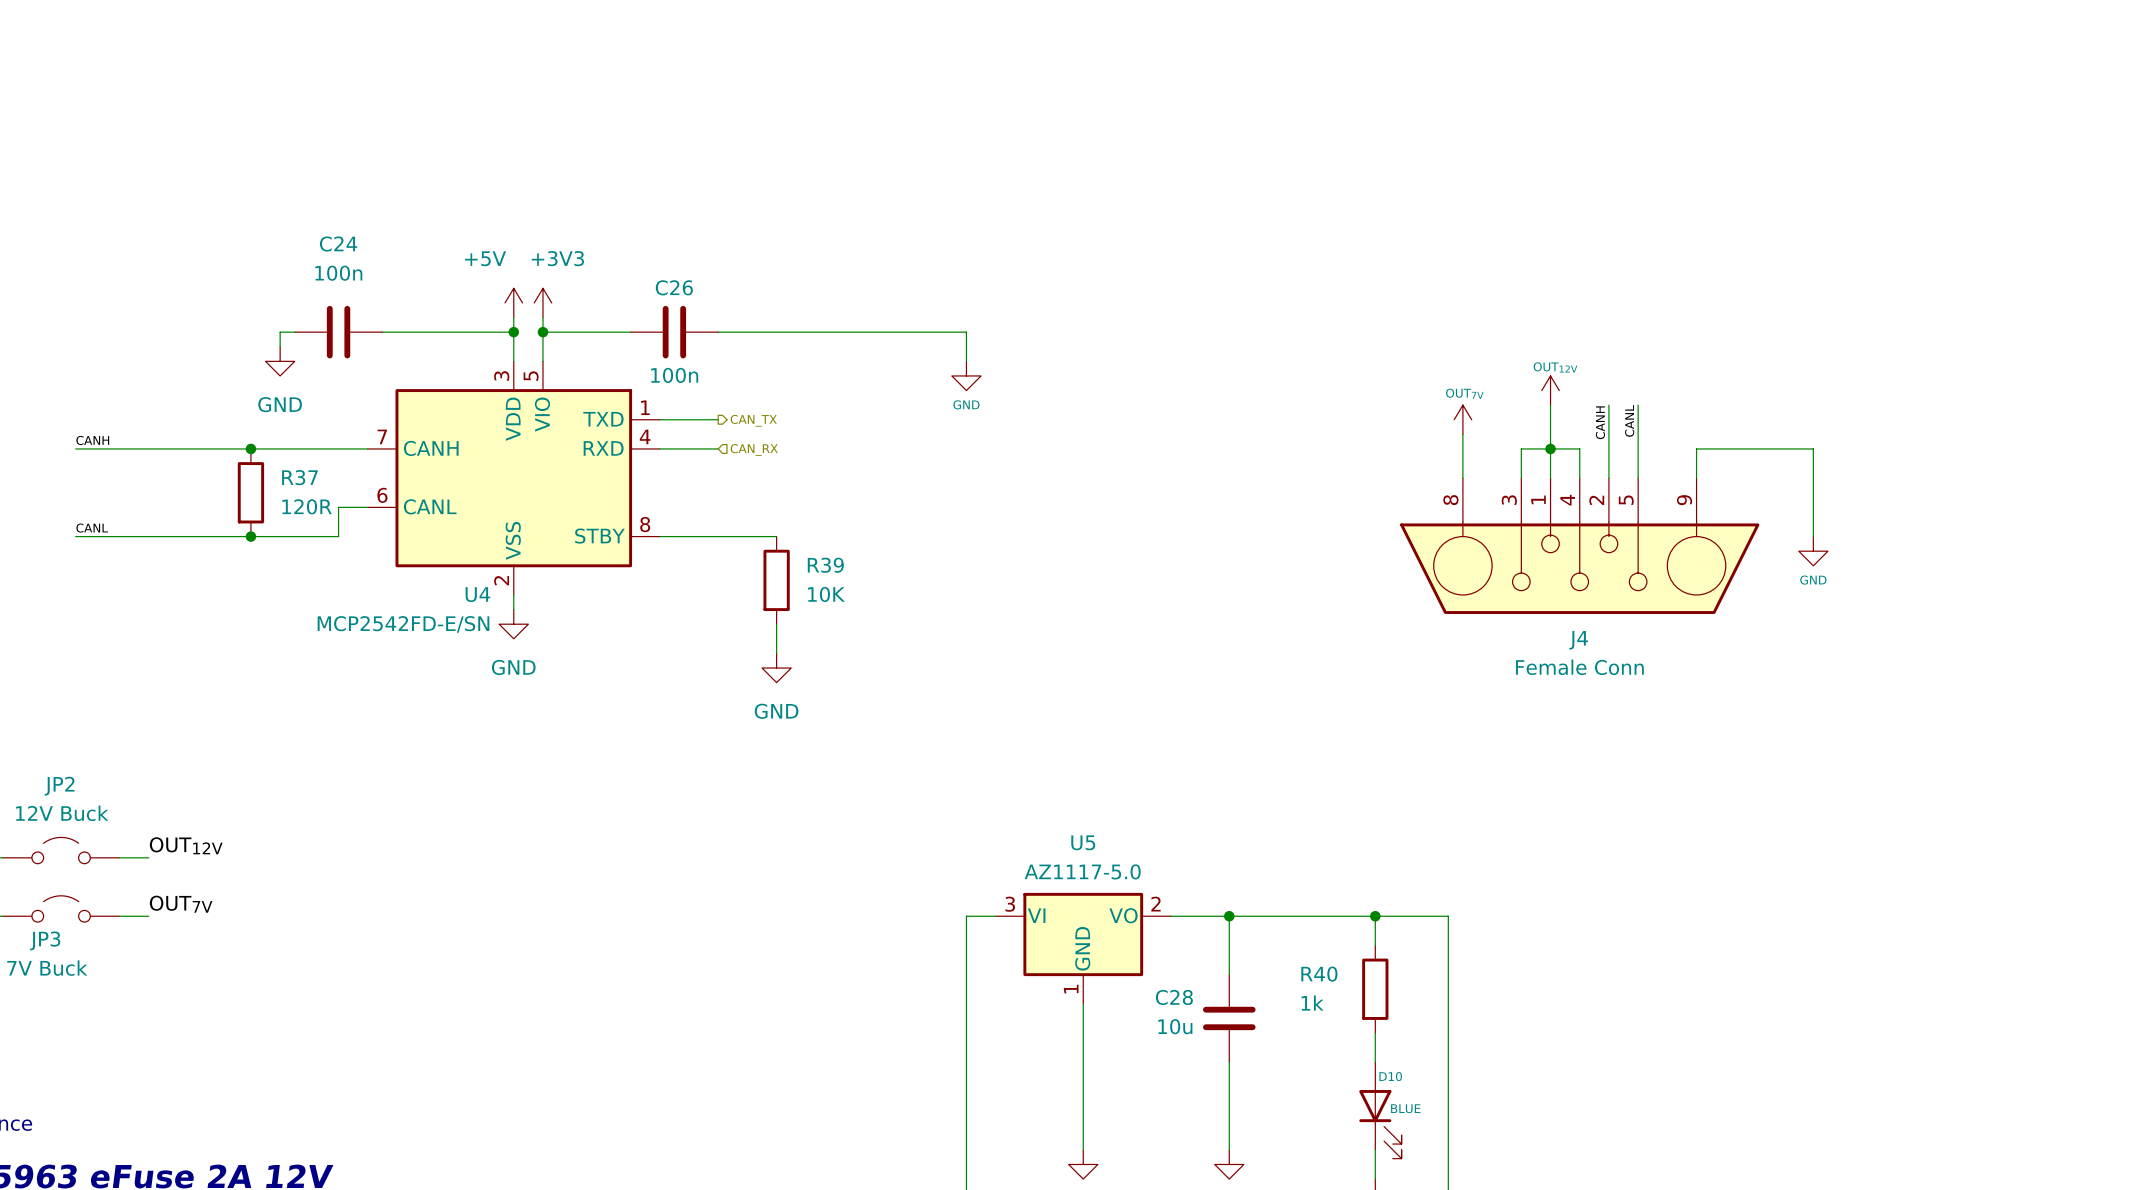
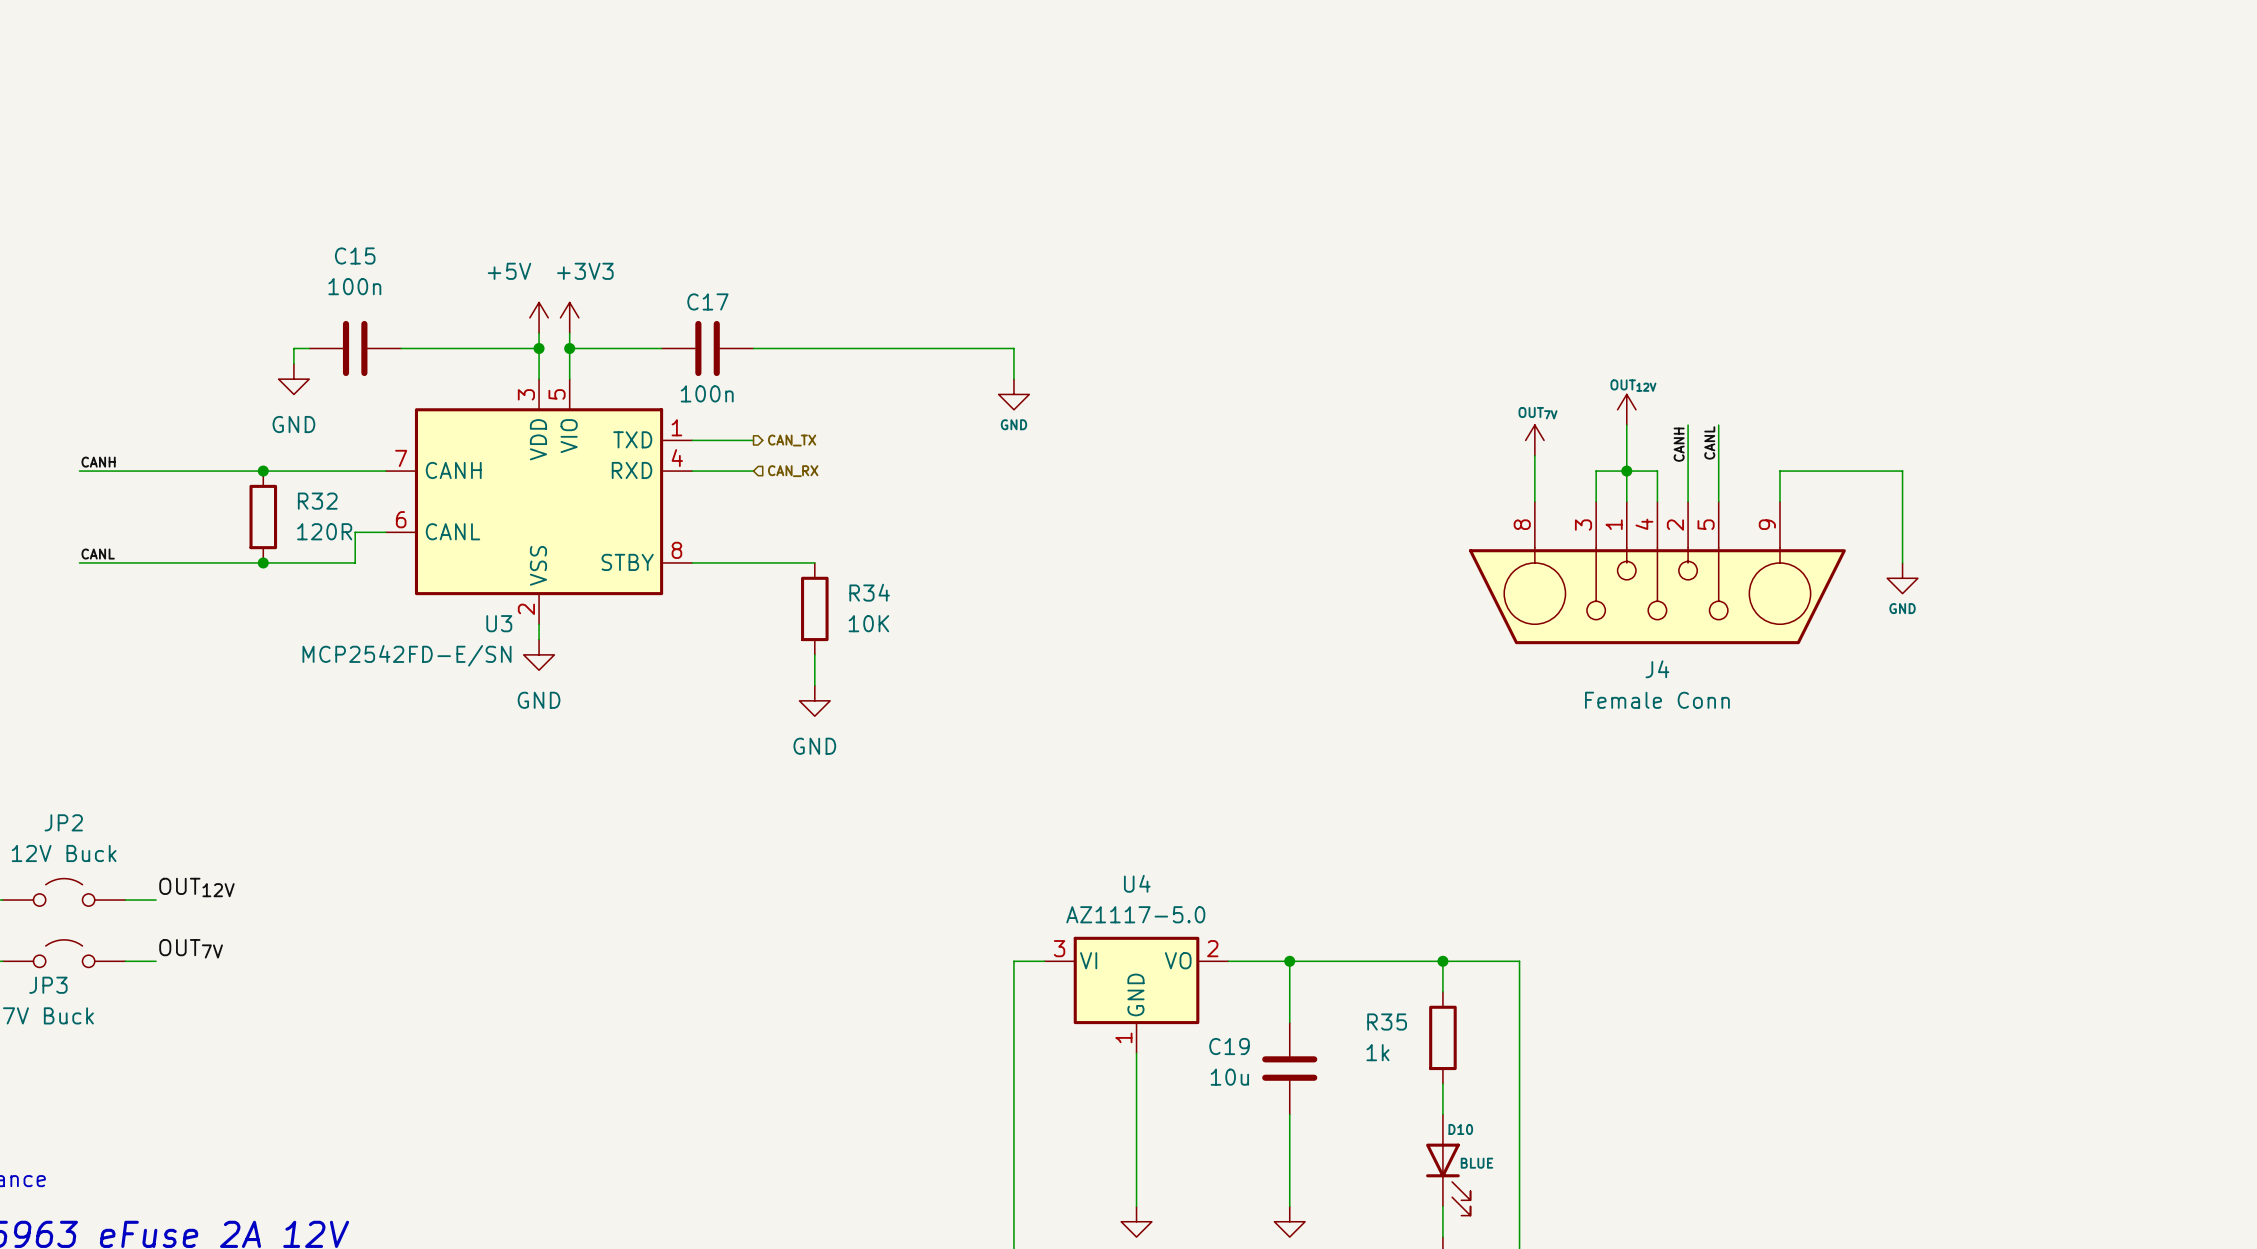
C24 name: C24 (338, 244) -> C15 (355, 256)
C26 name: C26 (674, 287) -> C17 (707, 301)
R37 name: R37 (299, 477) -> R32 (317, 501)
R39 name: R39 (825, 565) -> R34 (869, 592)
U4 name: U4 (477, 594) -> U3 (499, 623)
U5 name: U5 (1083, 842) -> U4 (1137, 883)
R40 name: R40 (1319, 974) -> R35 (1387, 1022)
C28 name: C28 (1174, 997) -> C19 (1229, 1046)

